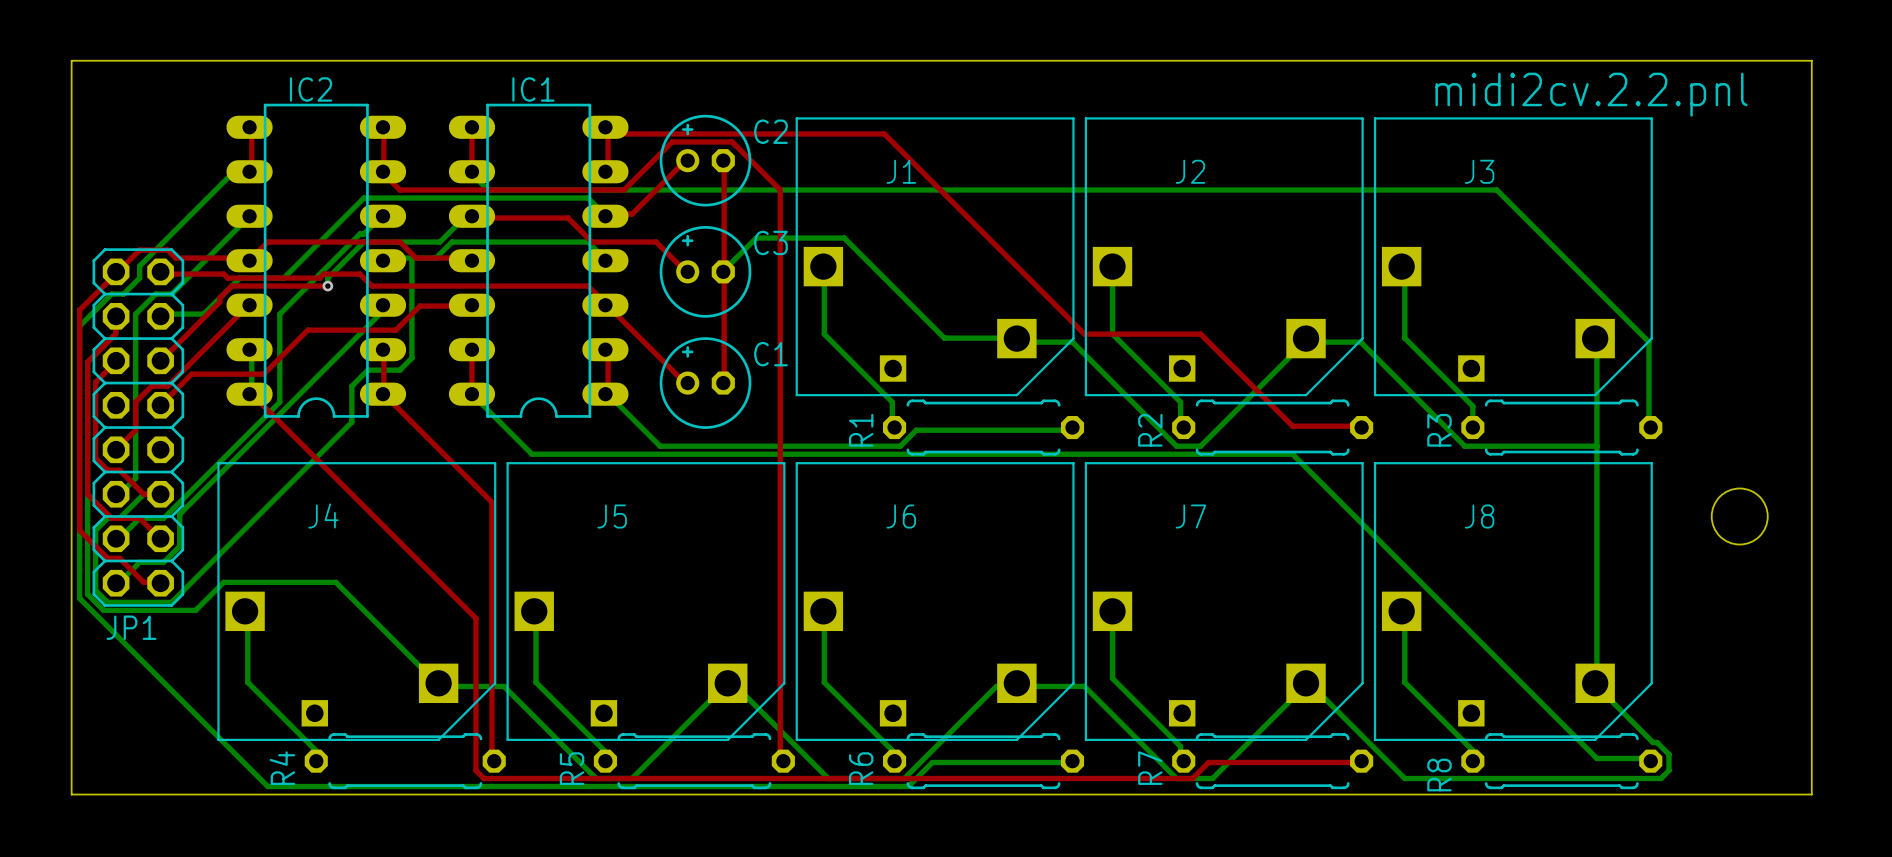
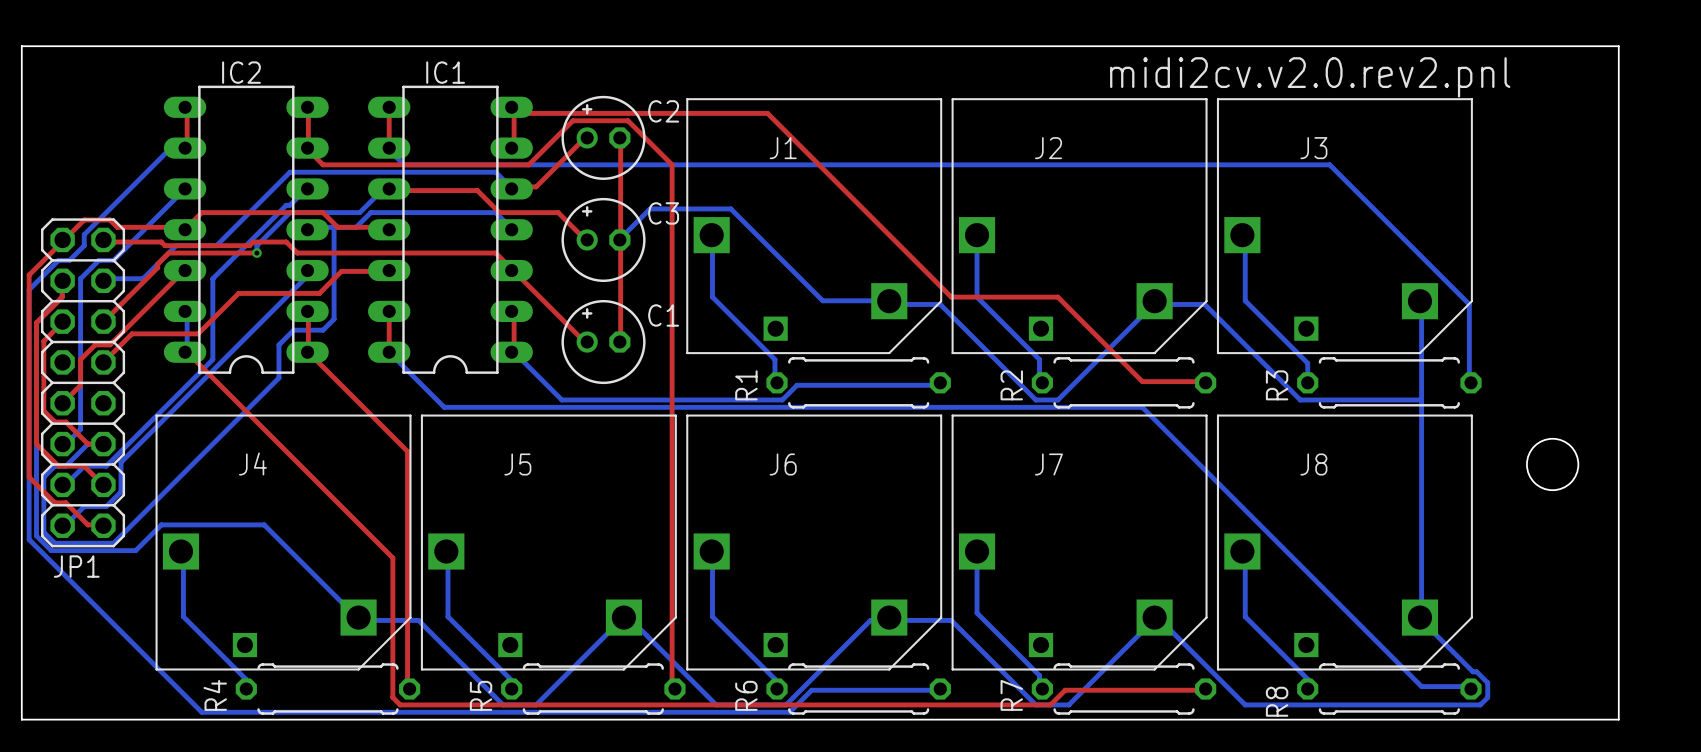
text: midi2cv.2.2.pnl (1591, 94) -> midi2cv.v2.0.rev2.pnl (1310, 77)

